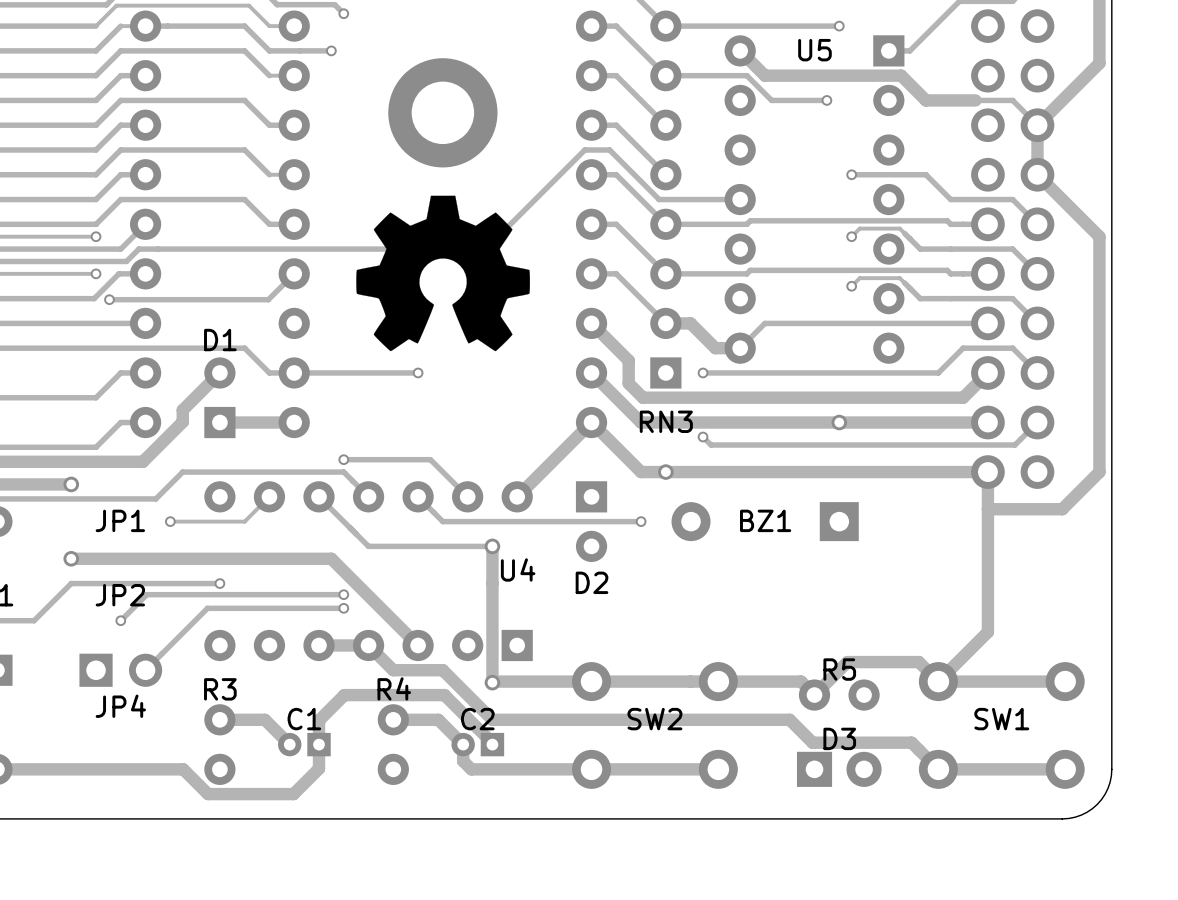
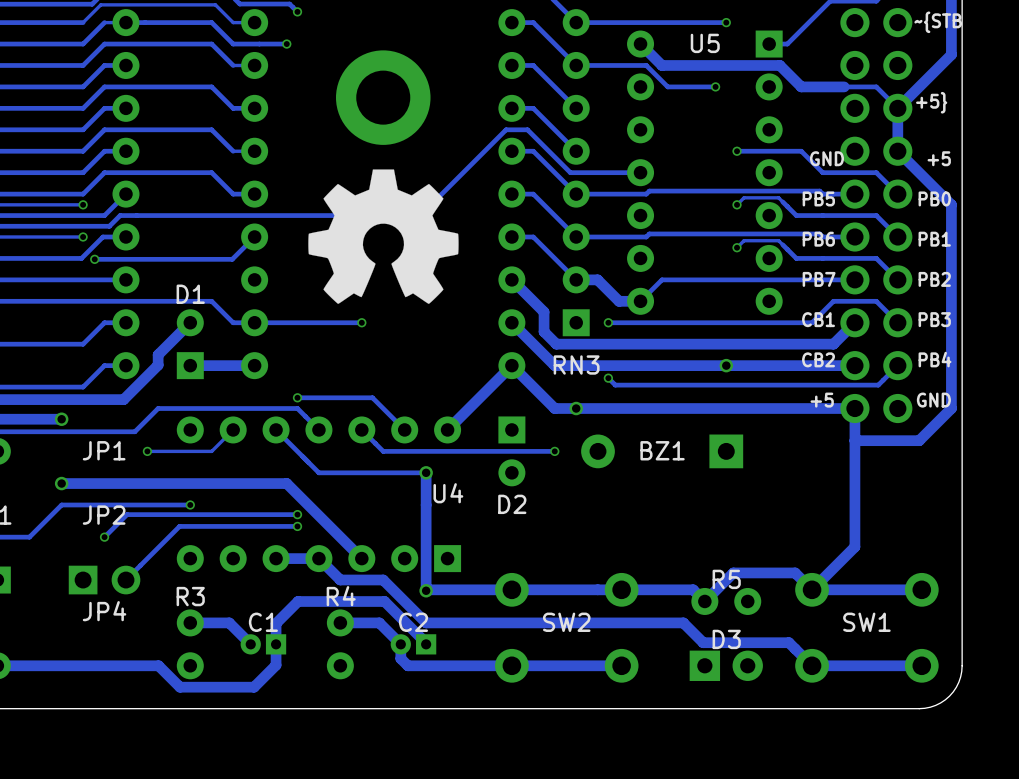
text: none -> ~{STB (938, 22)
text: none -> +5} (931, 102)
text: none -> GND +5 (880, 158)
text: none -> PB5 PB0 (876, 198)
text: none -> PB6 PB1 (876, 239)
text: none -> PB7 PB2 (876, 279)
text: none -> CB1 PB3 (876, 319)
text: none -> CB2 PB4 (876, 359)
text: none -> +5 GND (880, 400)

